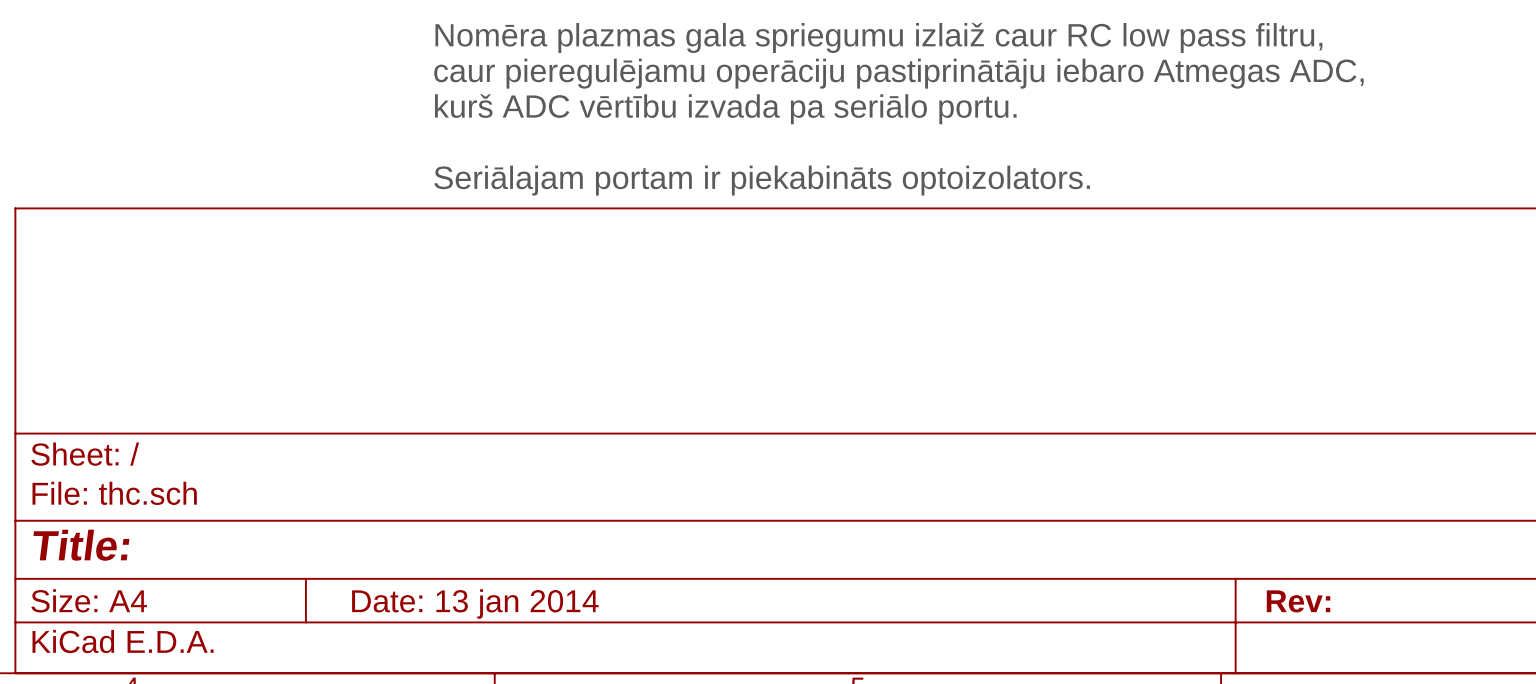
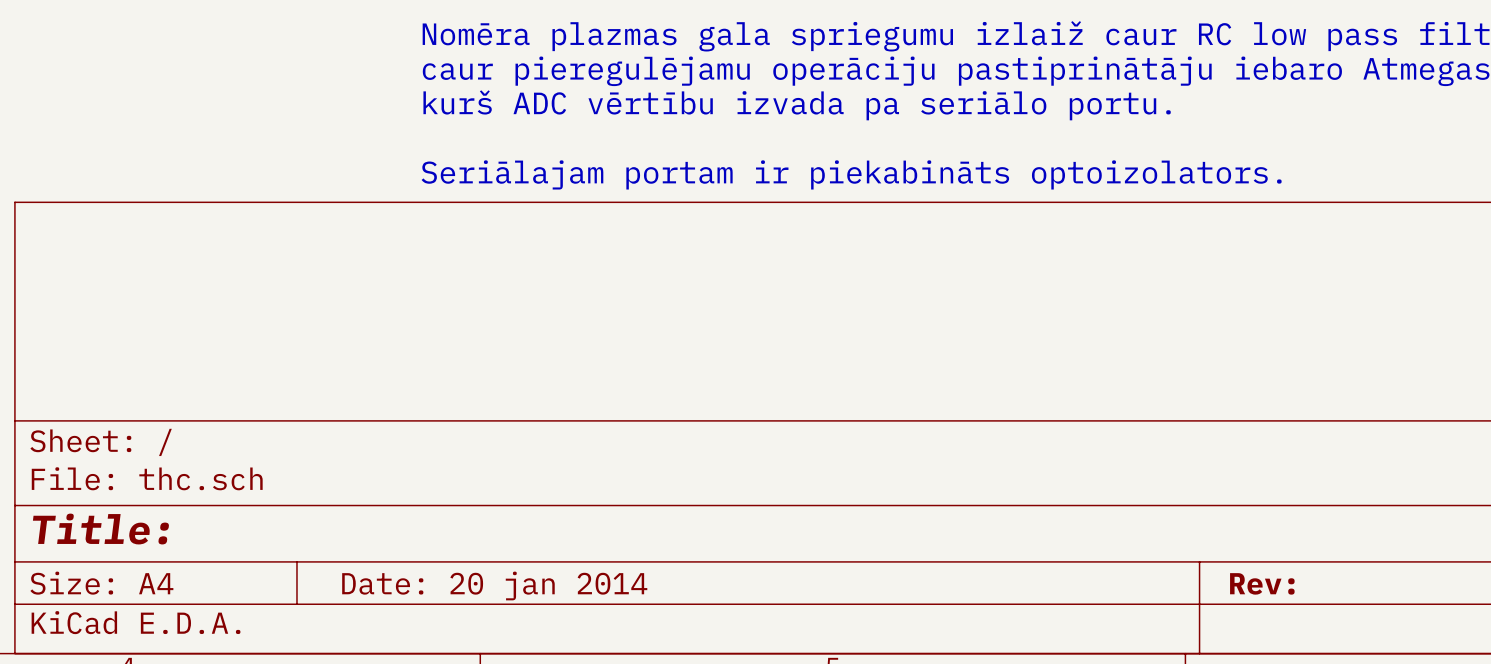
title block: Date: 13 jan 2014 (475, 603) -> Date: 20 jan 2014 (494, 585)

